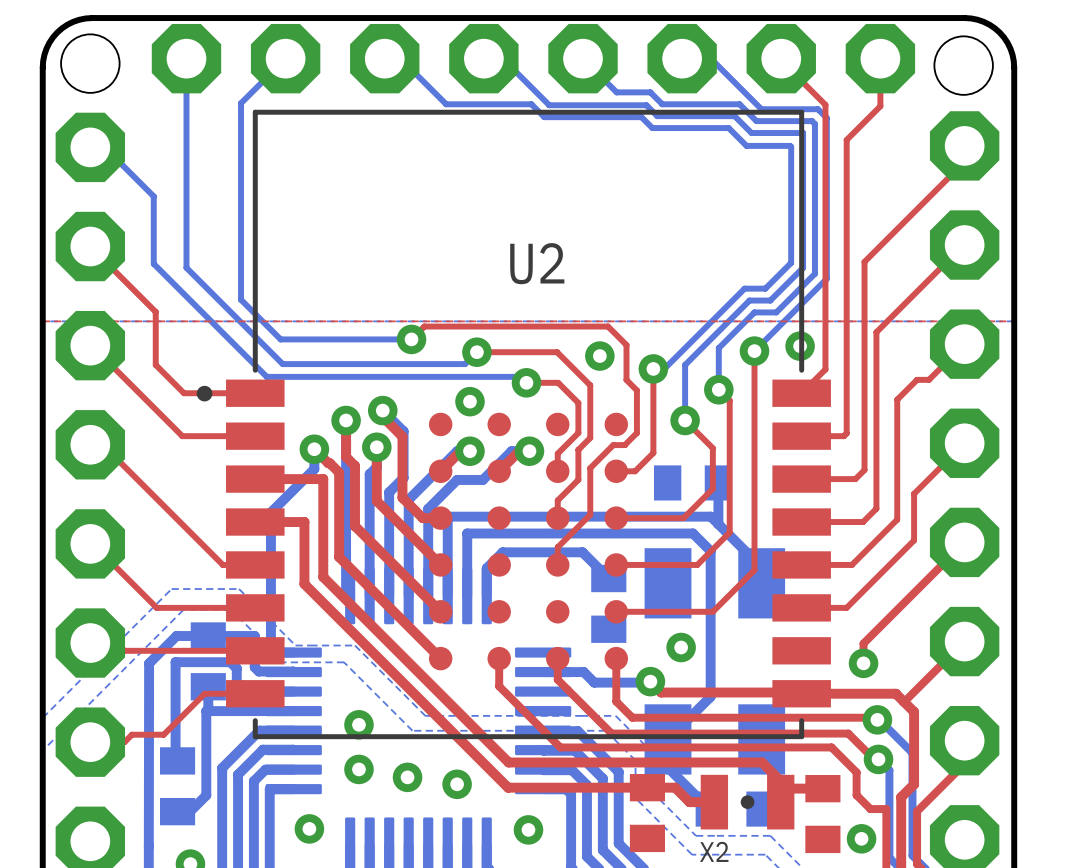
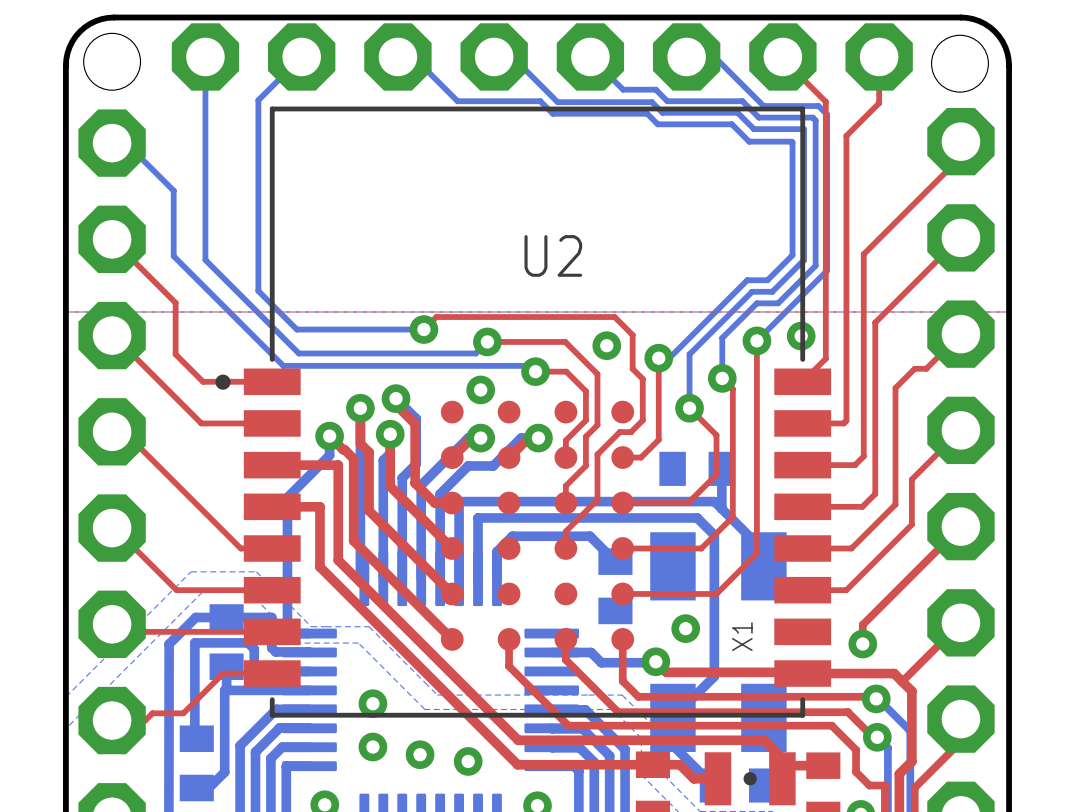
X1 name: none -> X1 (742, 636)

